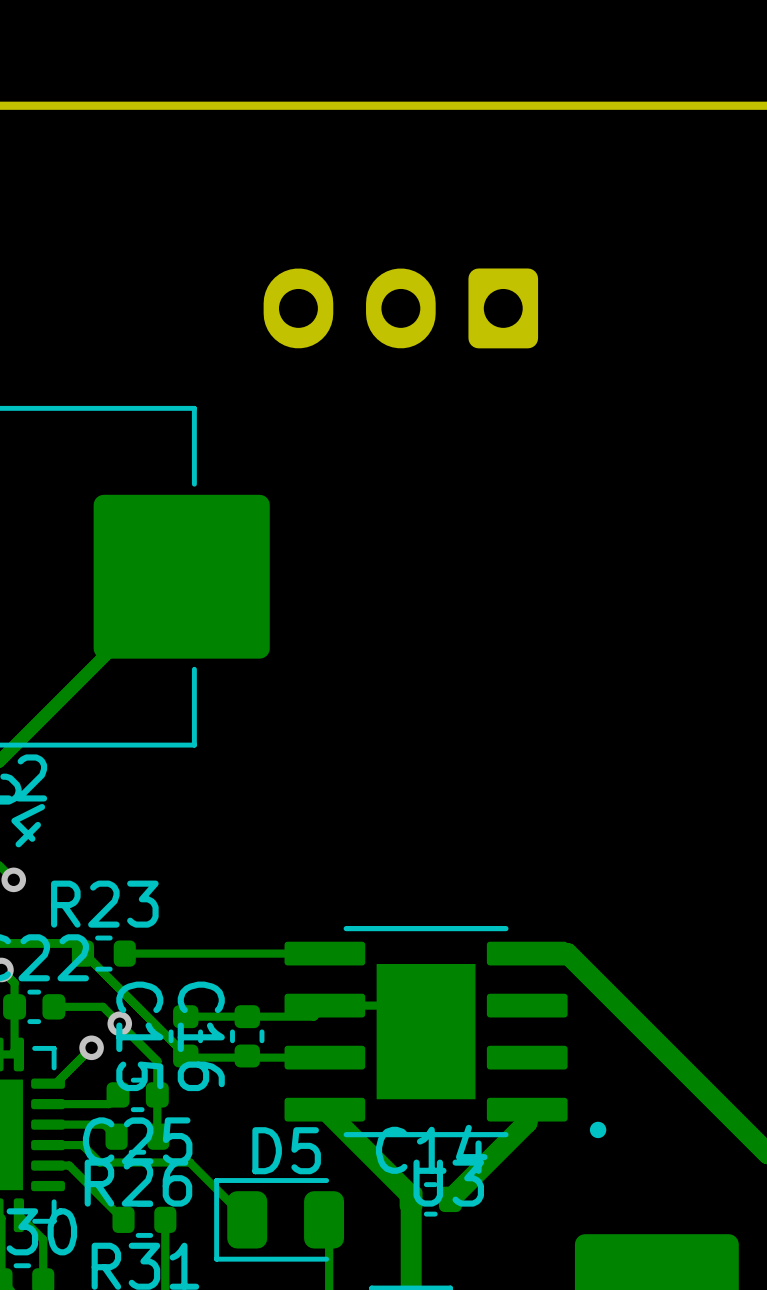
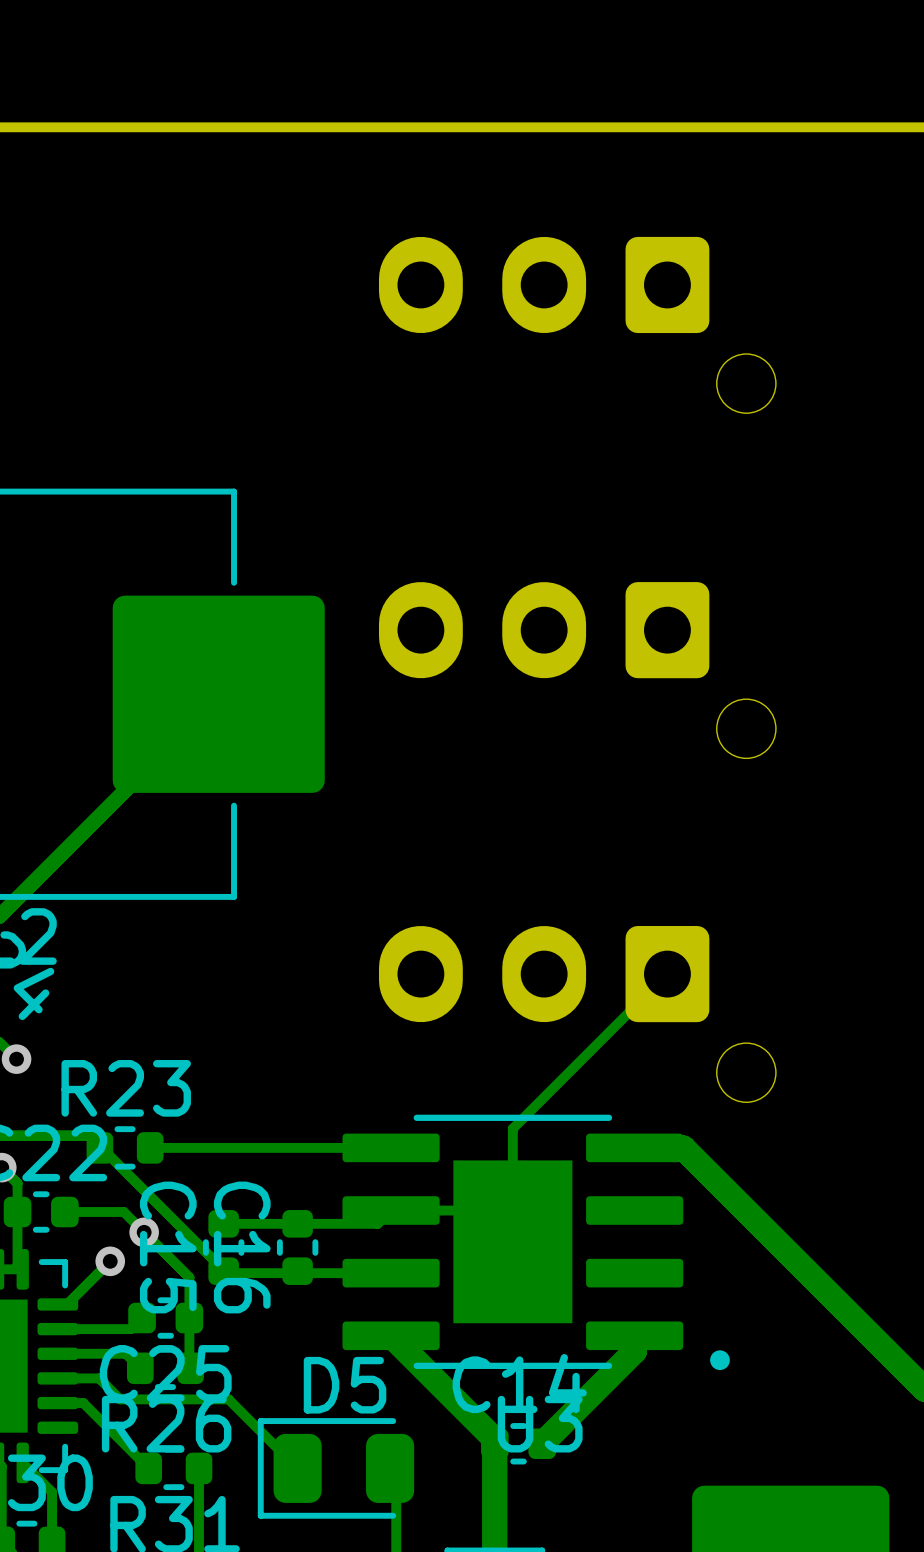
part: none -> (577, 325)
part: (400, 308) -> none
part: none -> (577, 670)
track: none -> (667, 974) (512, 1128) (512, 1241)
part: none -> (577, 1014)

